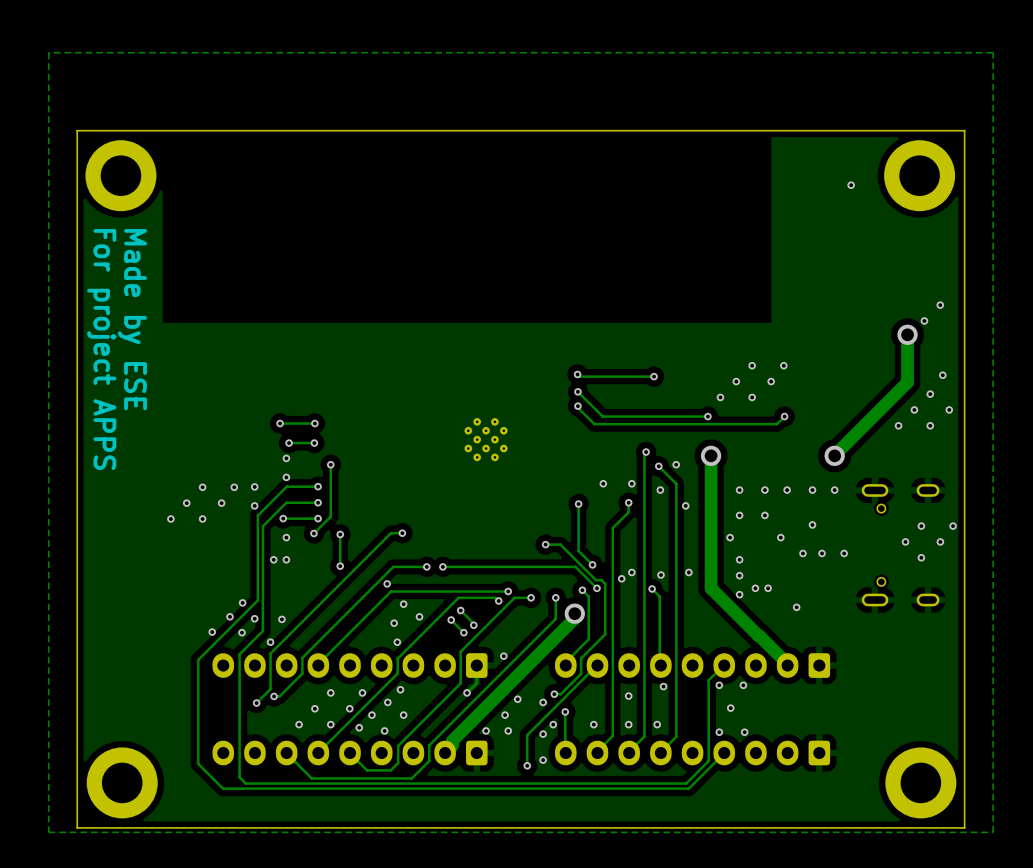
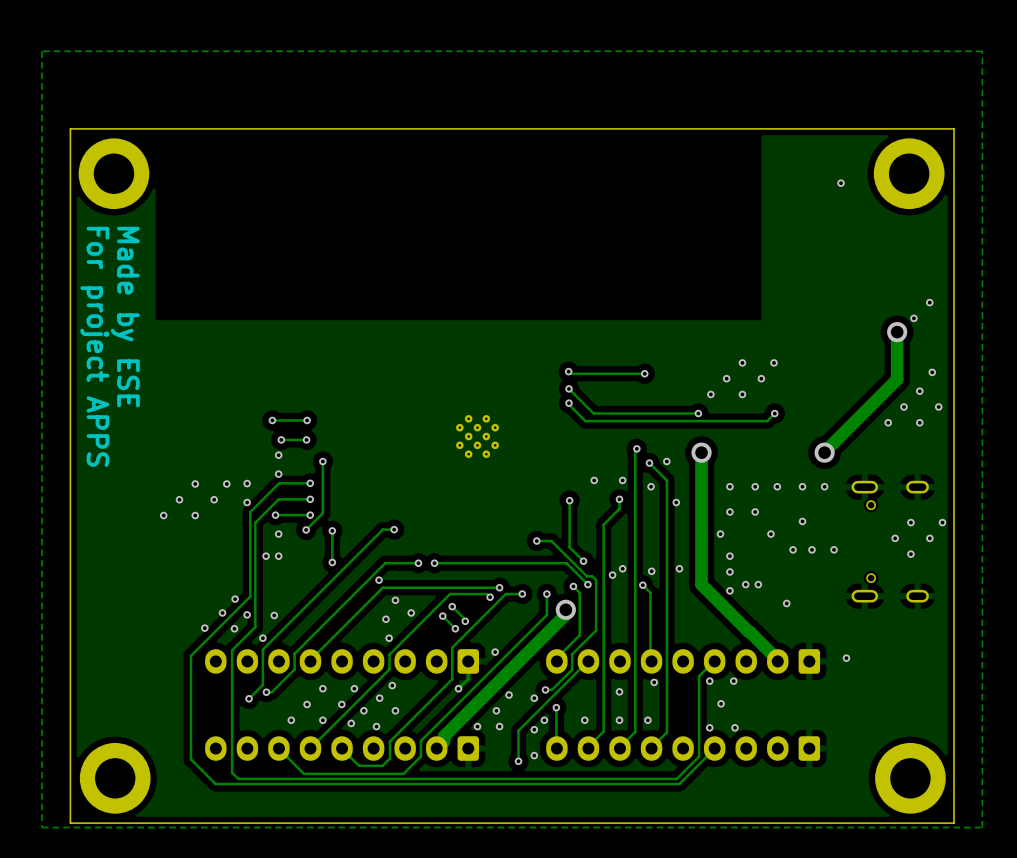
via: none -> (846, 658)

